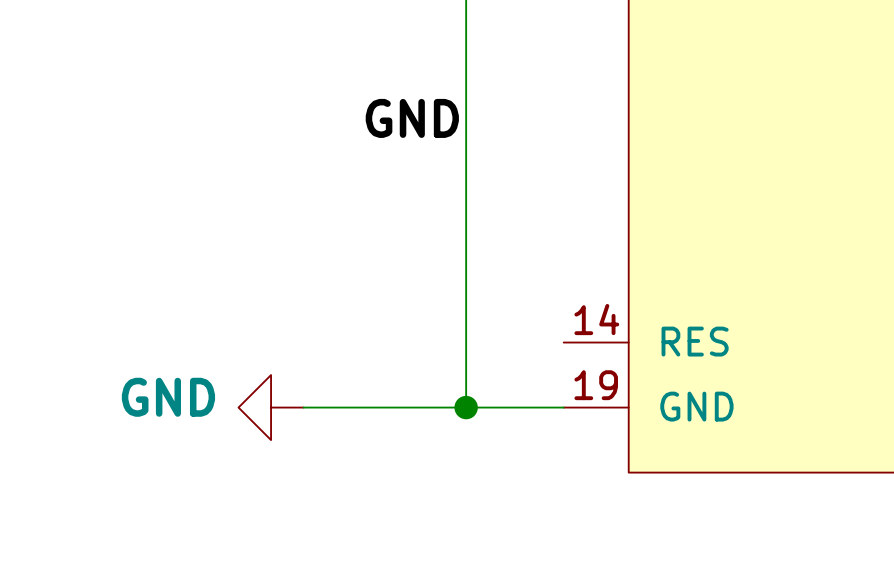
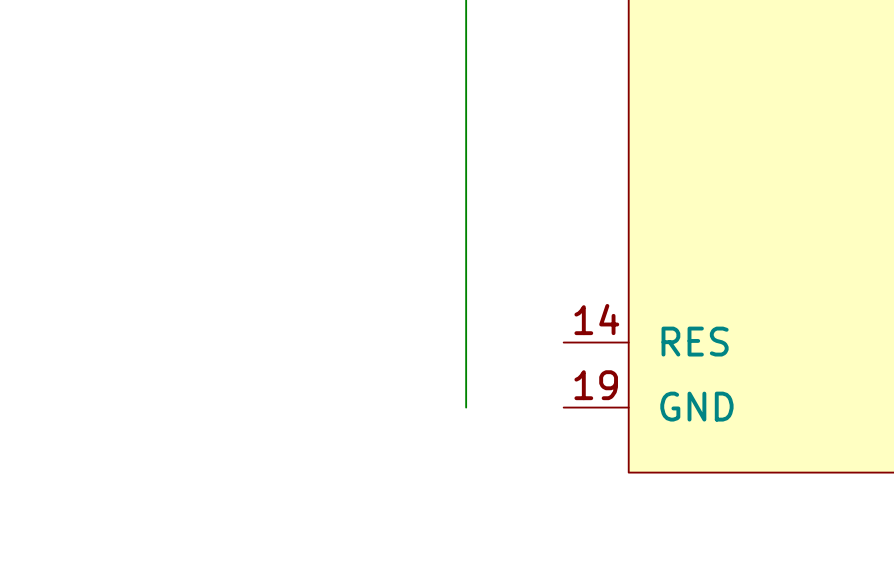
label: GND (412, 118) -> none
power symbol: GND (271, 407) -> none
wire: (303, 407) (563, 407) -> none
junction: (466, 407) -> none

